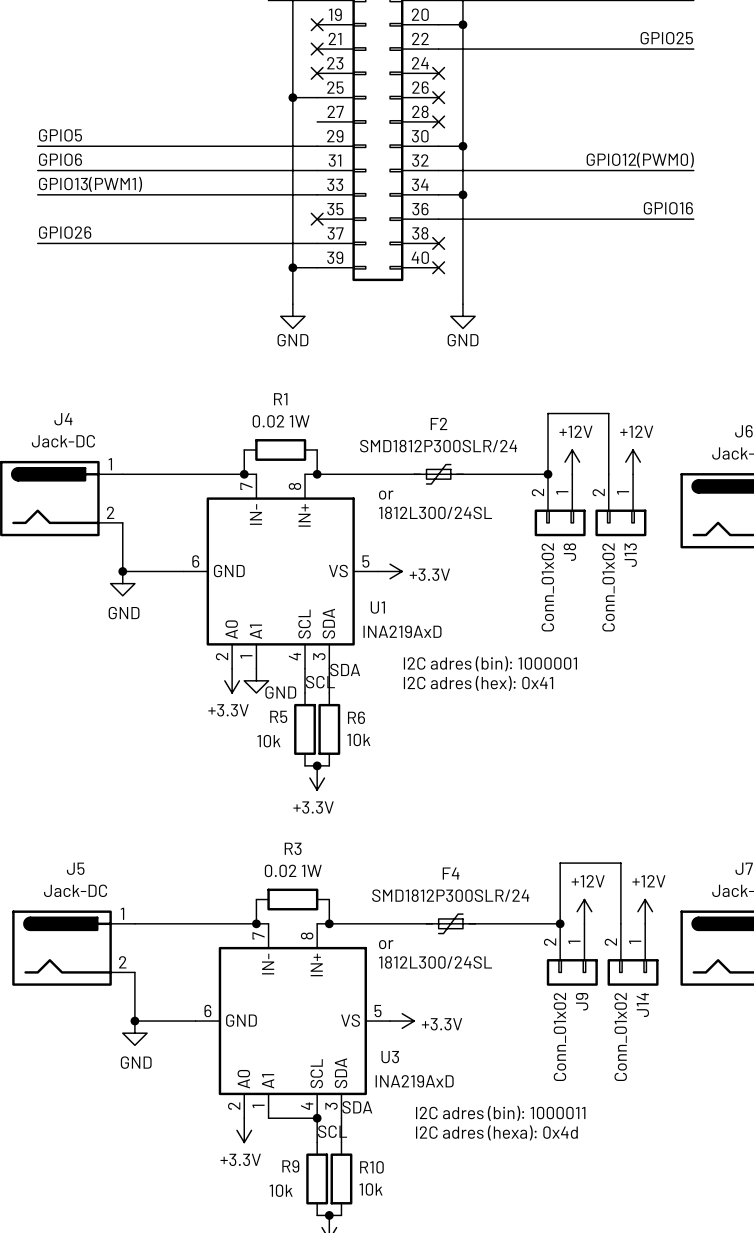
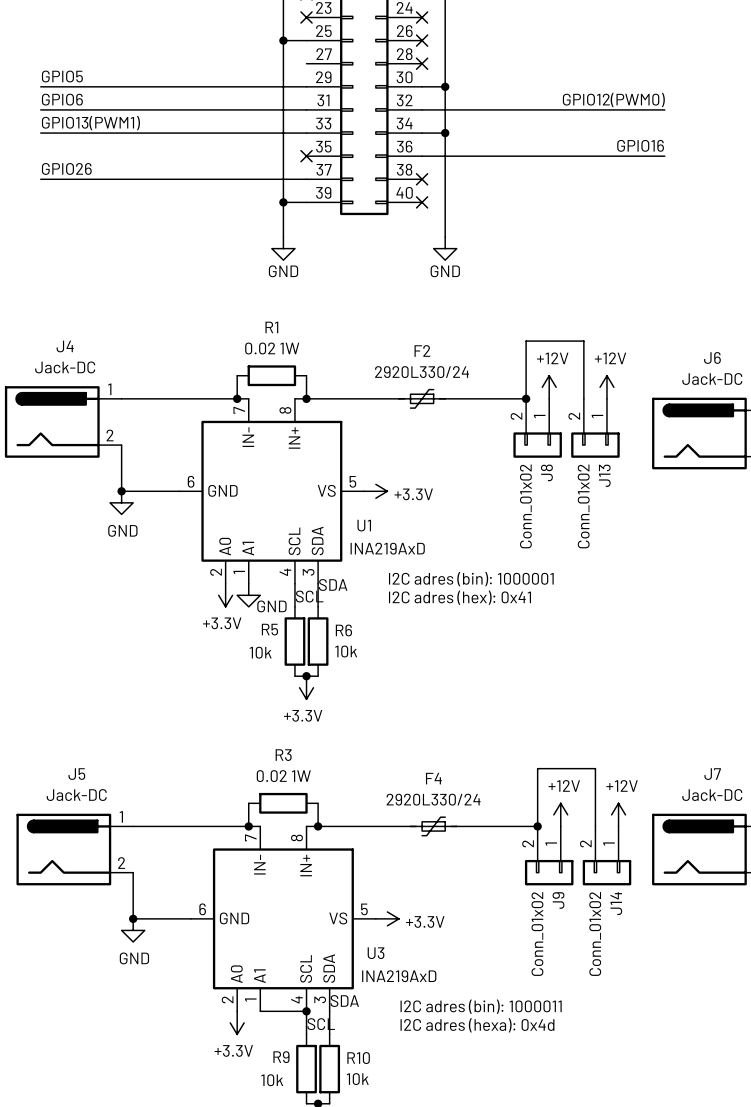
F2 value: SMD1812P300SLR/24 (438, 446) -> 2920L330/24 (422, 372)
text: or (386, 495) -> none
text: 1812L300/24SL (435, 512) -> none
F4 value: SMD1812P300SLR/24 (450, 895) -> 2920L330/24 (433, 799)
text: or (386, 944) -> none
text: 1812L300/24SL (435, 962) -> none

